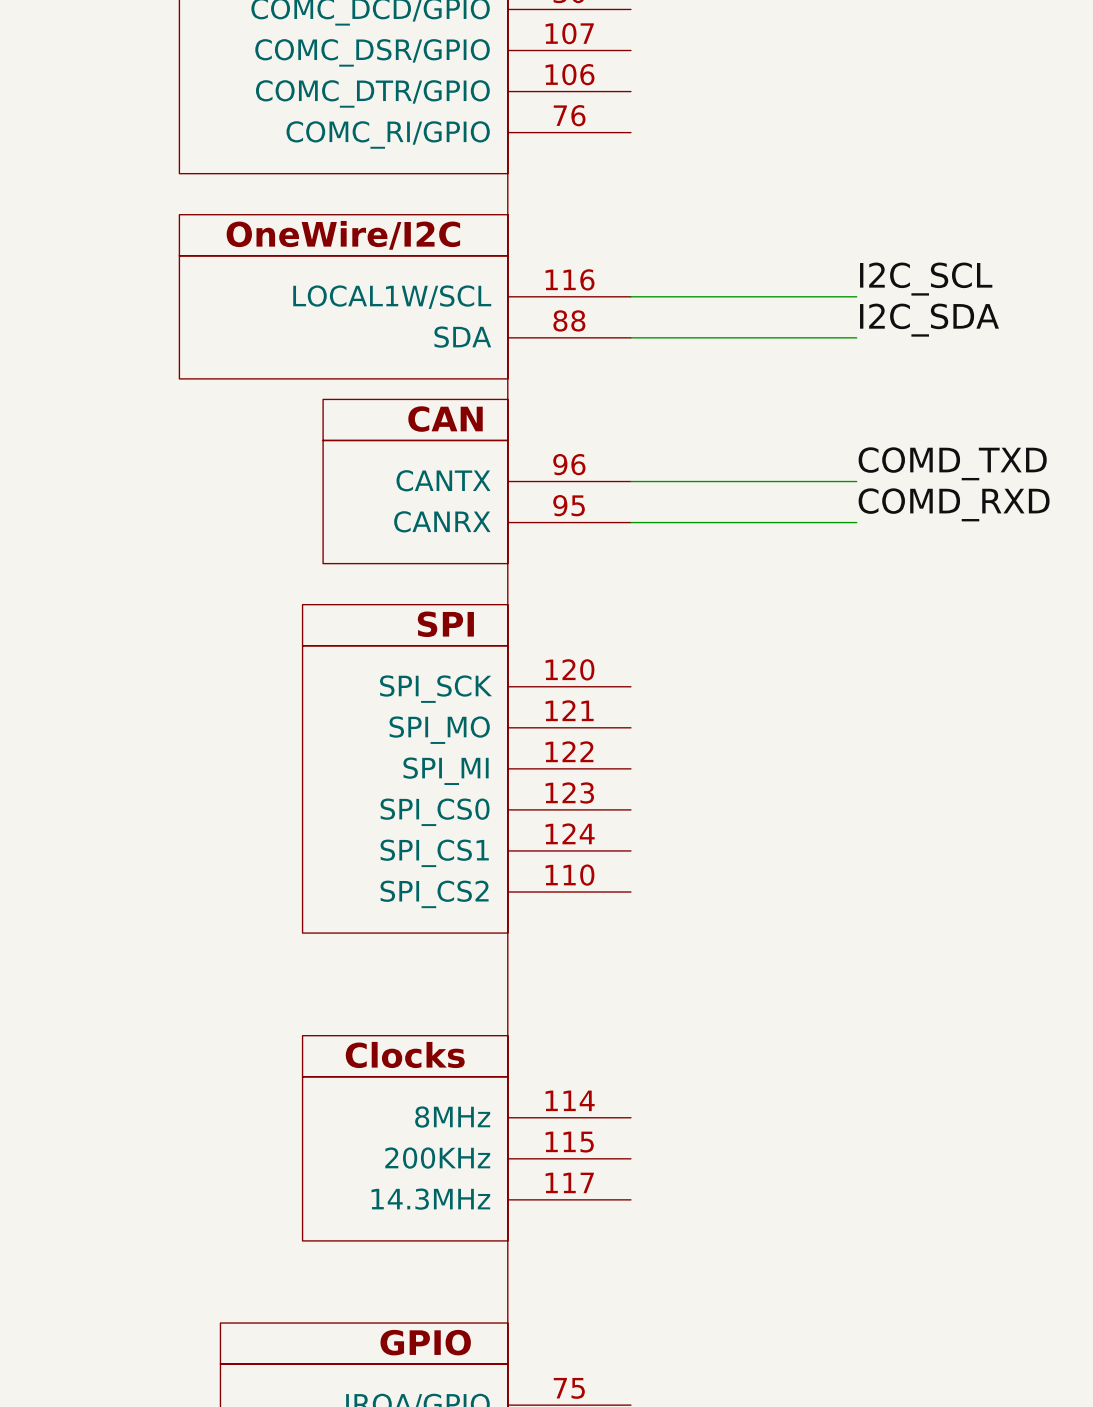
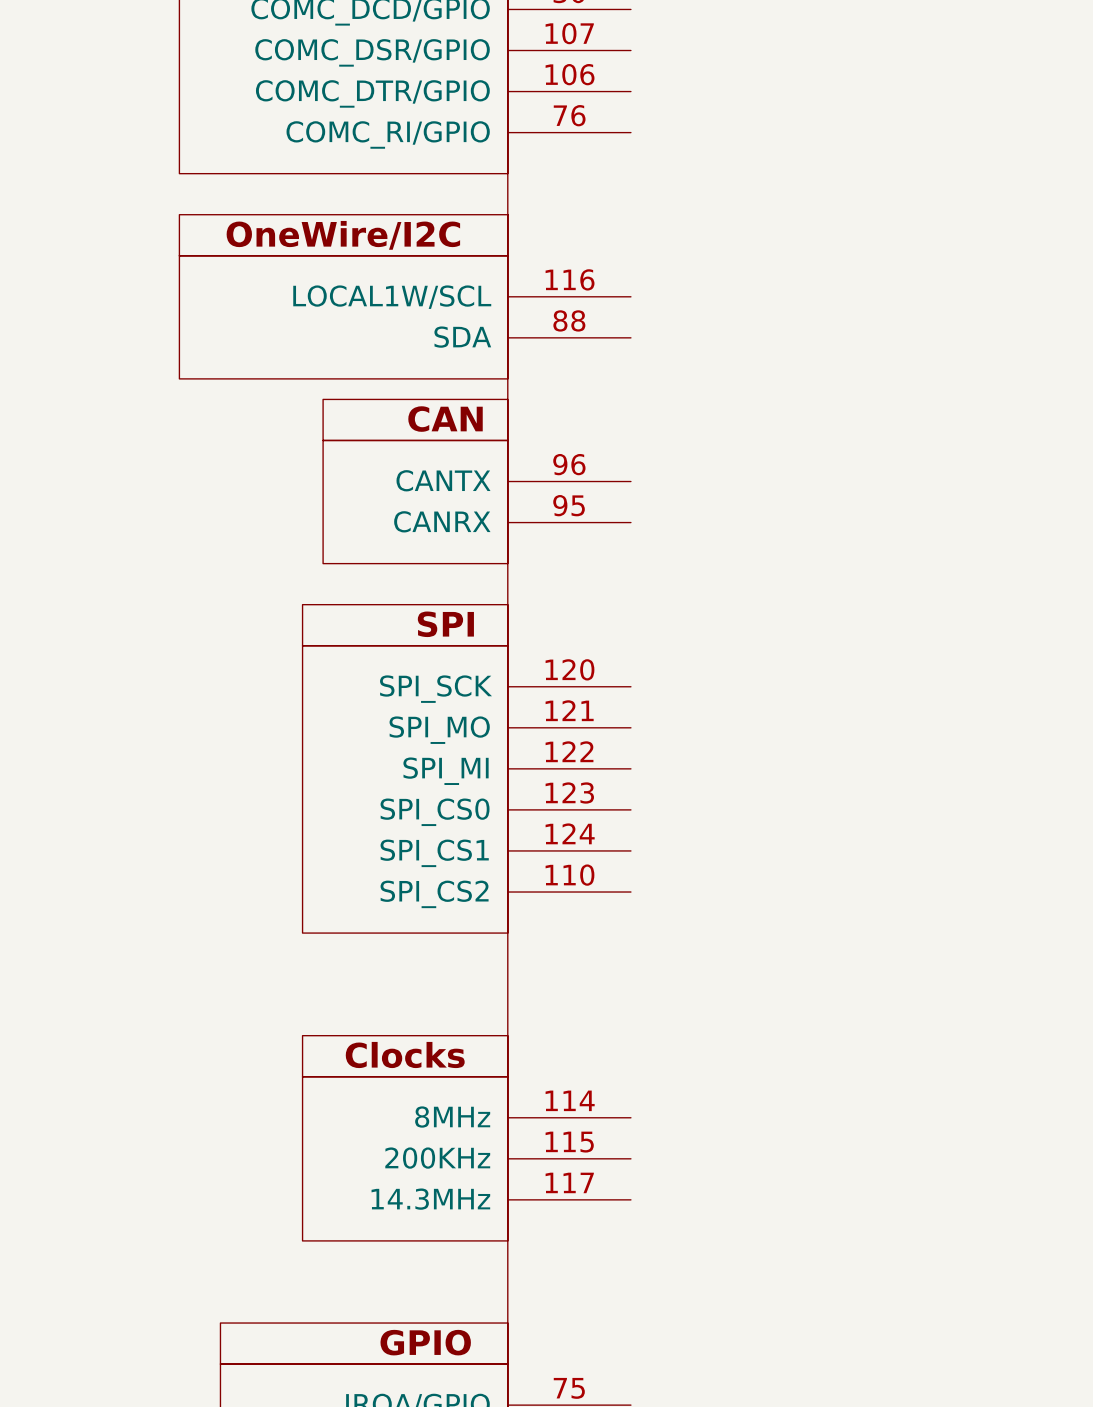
label: I2C_SCL (926, 279) -> none
wire: (630, 296) (856, 296) -> none
label: I2C_SDA (929, 320) -> none
wire: (630, 337) (856, 337) -> none
label: COMD_TXD (952, 463) -> none
wire: (630, 481) (856, 481) -> none
label: COMD_RXD (954, 504) -> none
wire: (630, 522) (856, 522) -> none

